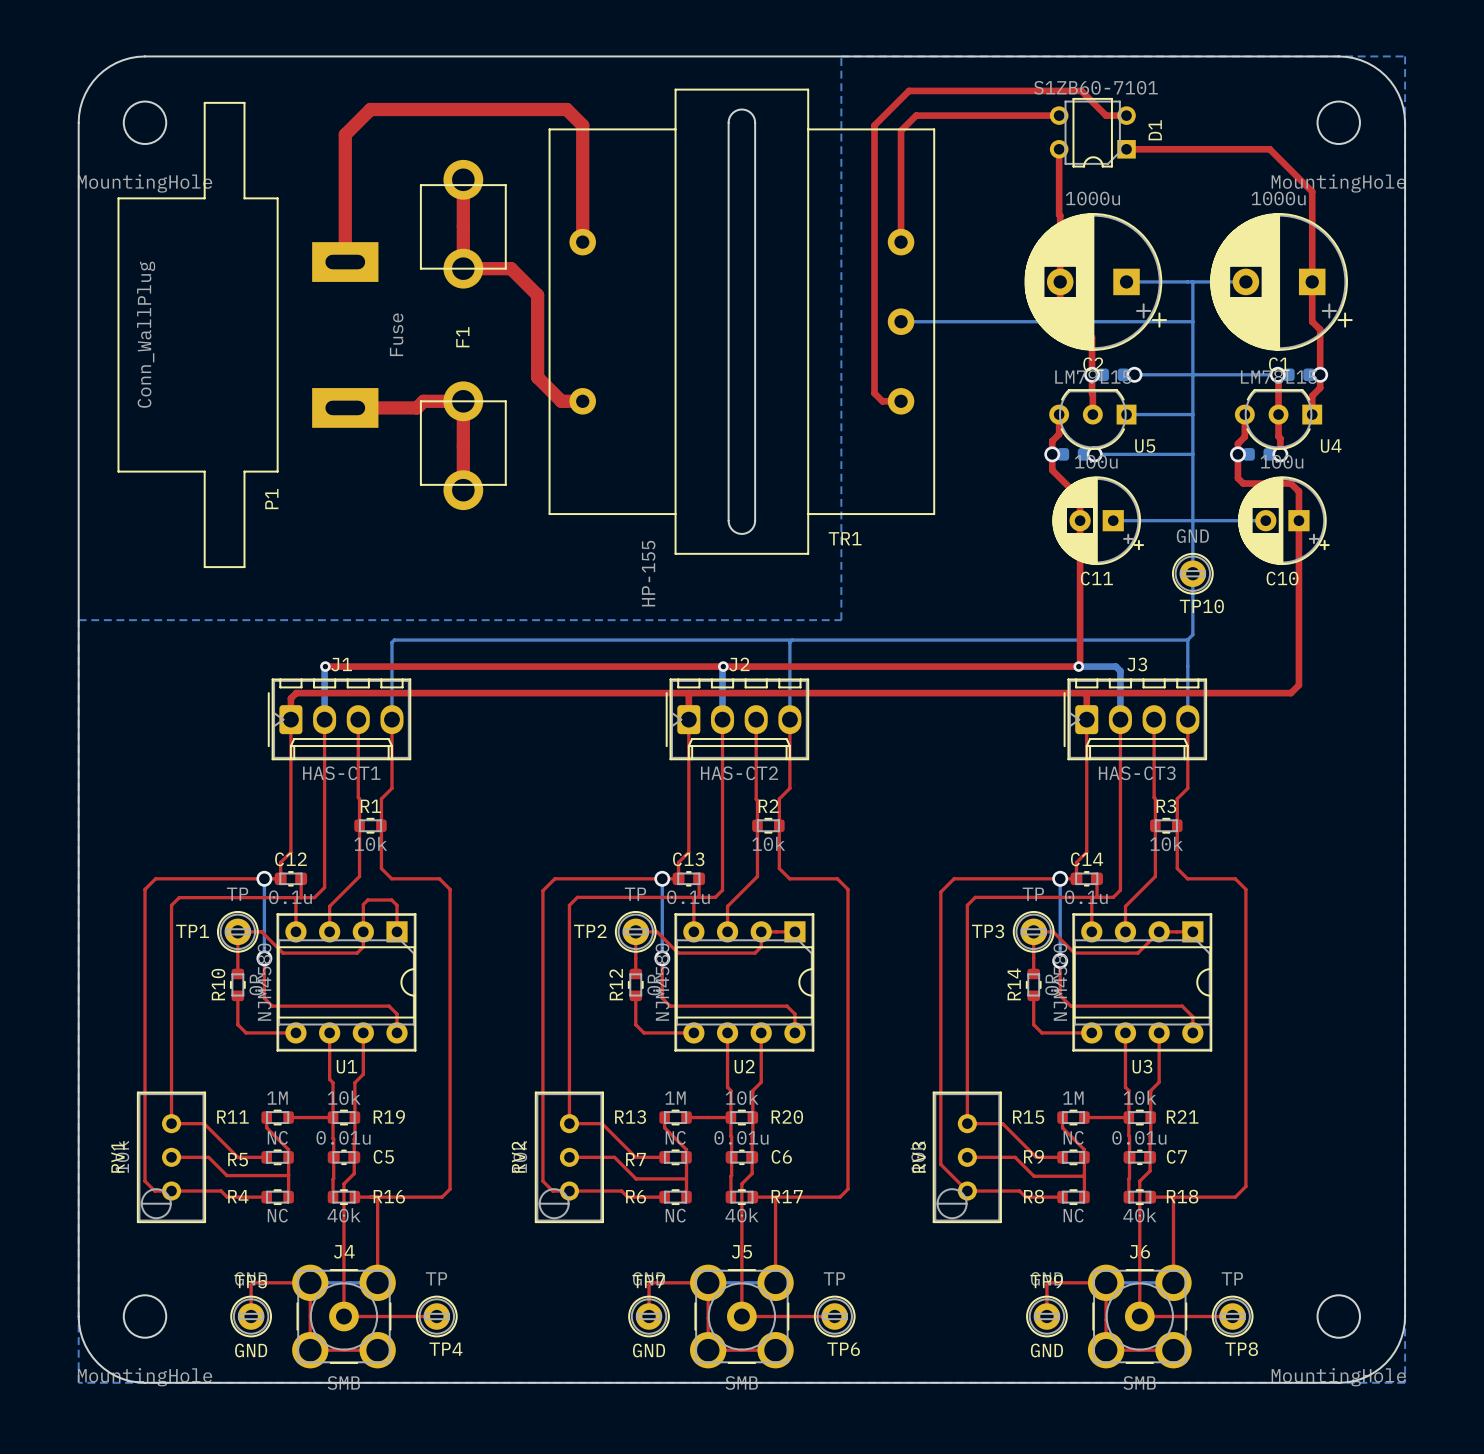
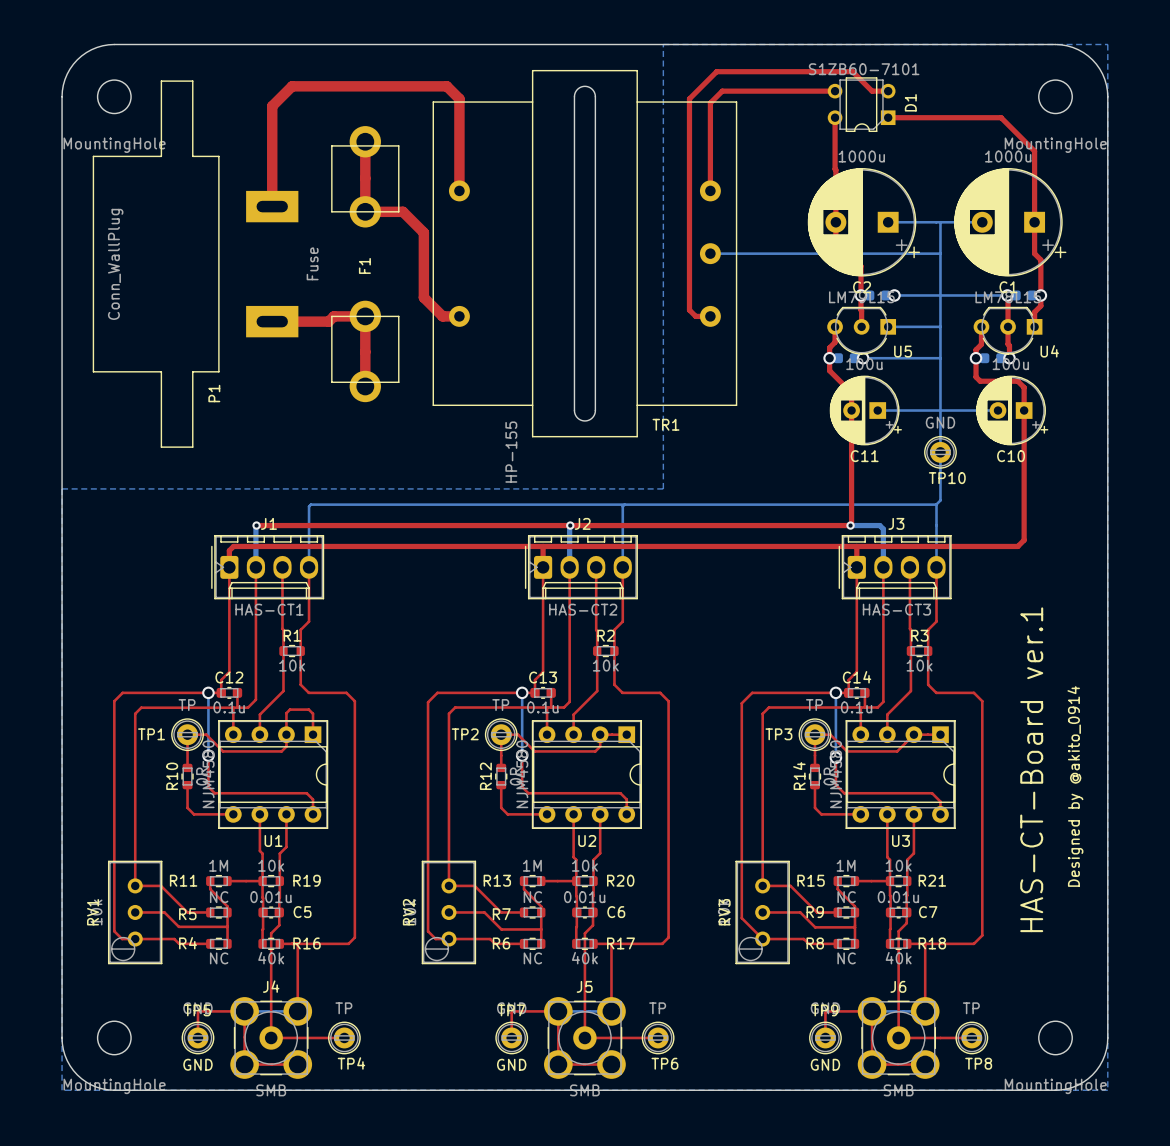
text: none -> HAS-CT-Board ver.1 (1031, 769)
text: none -> Designed by @akito_0914 (1075, 786)

